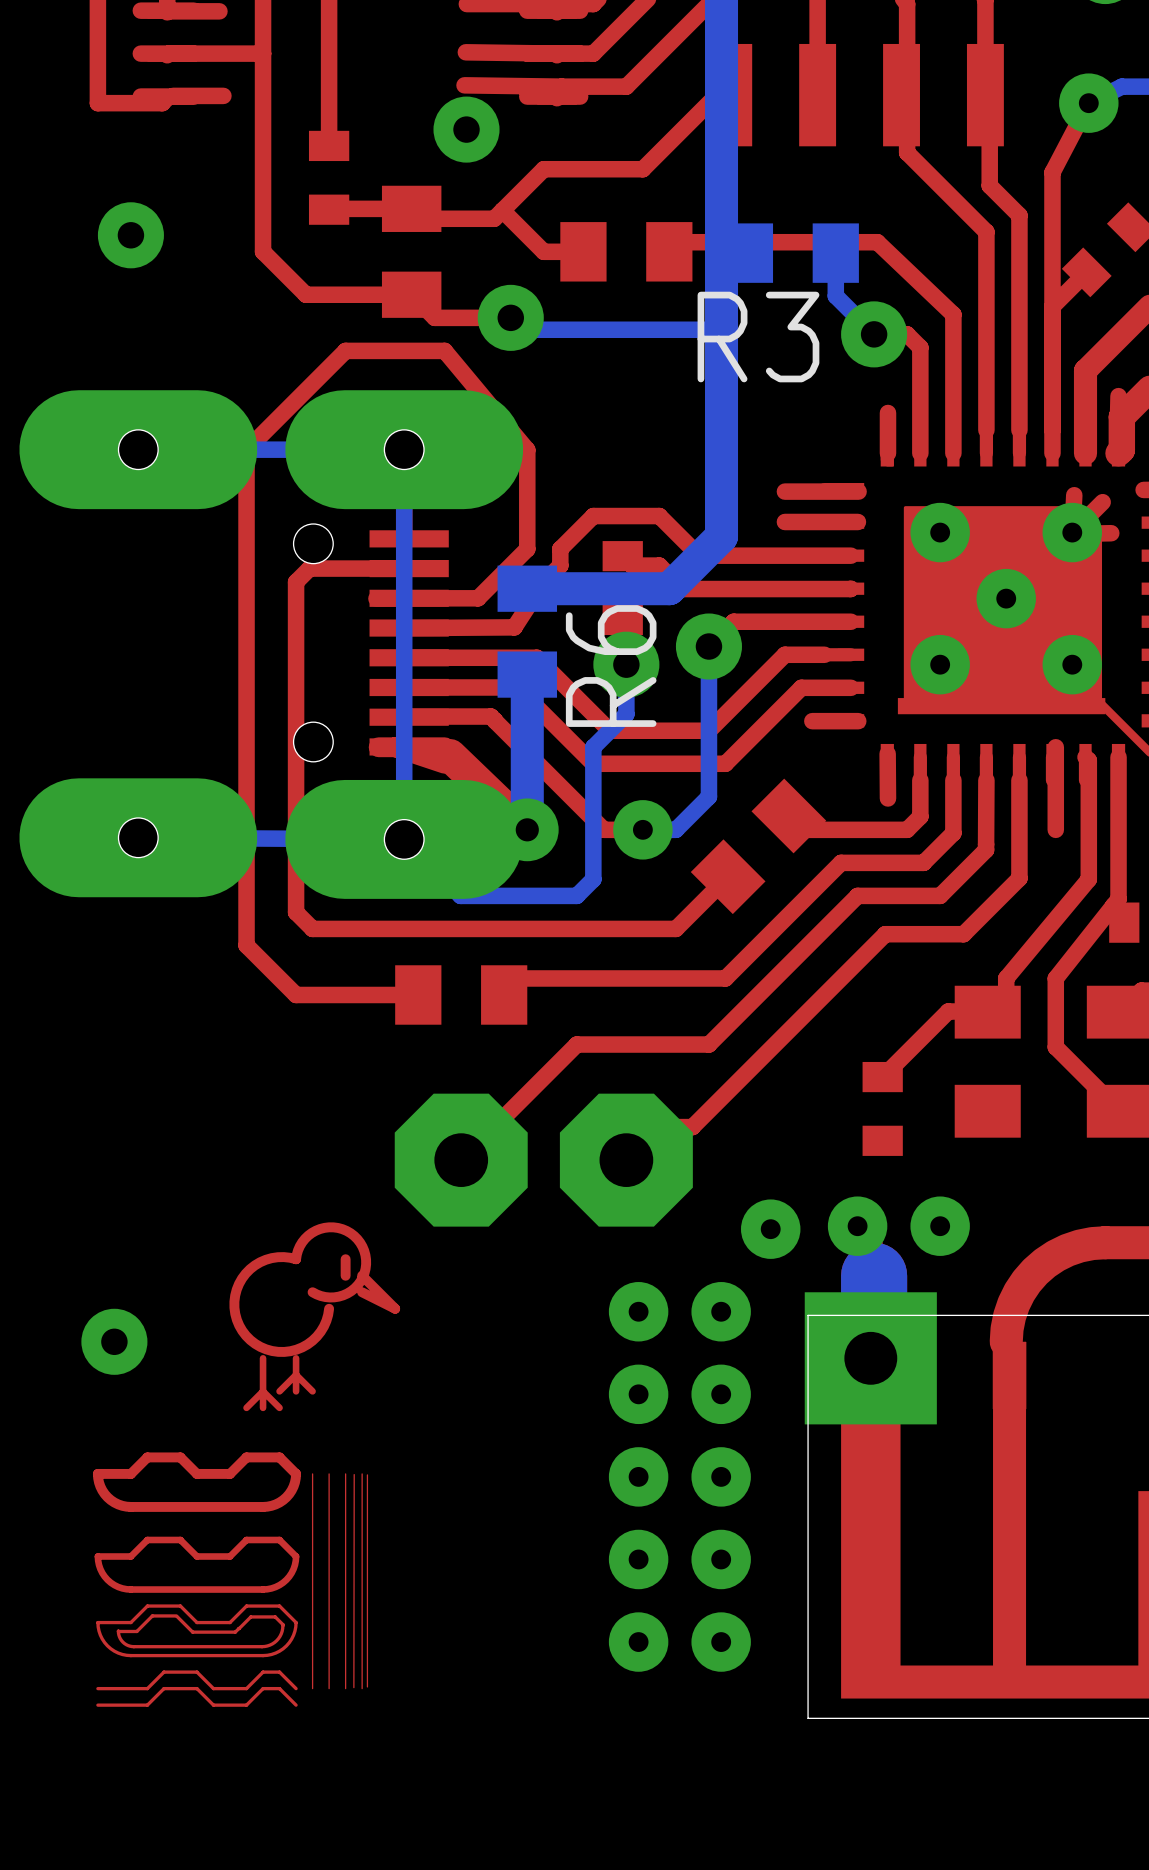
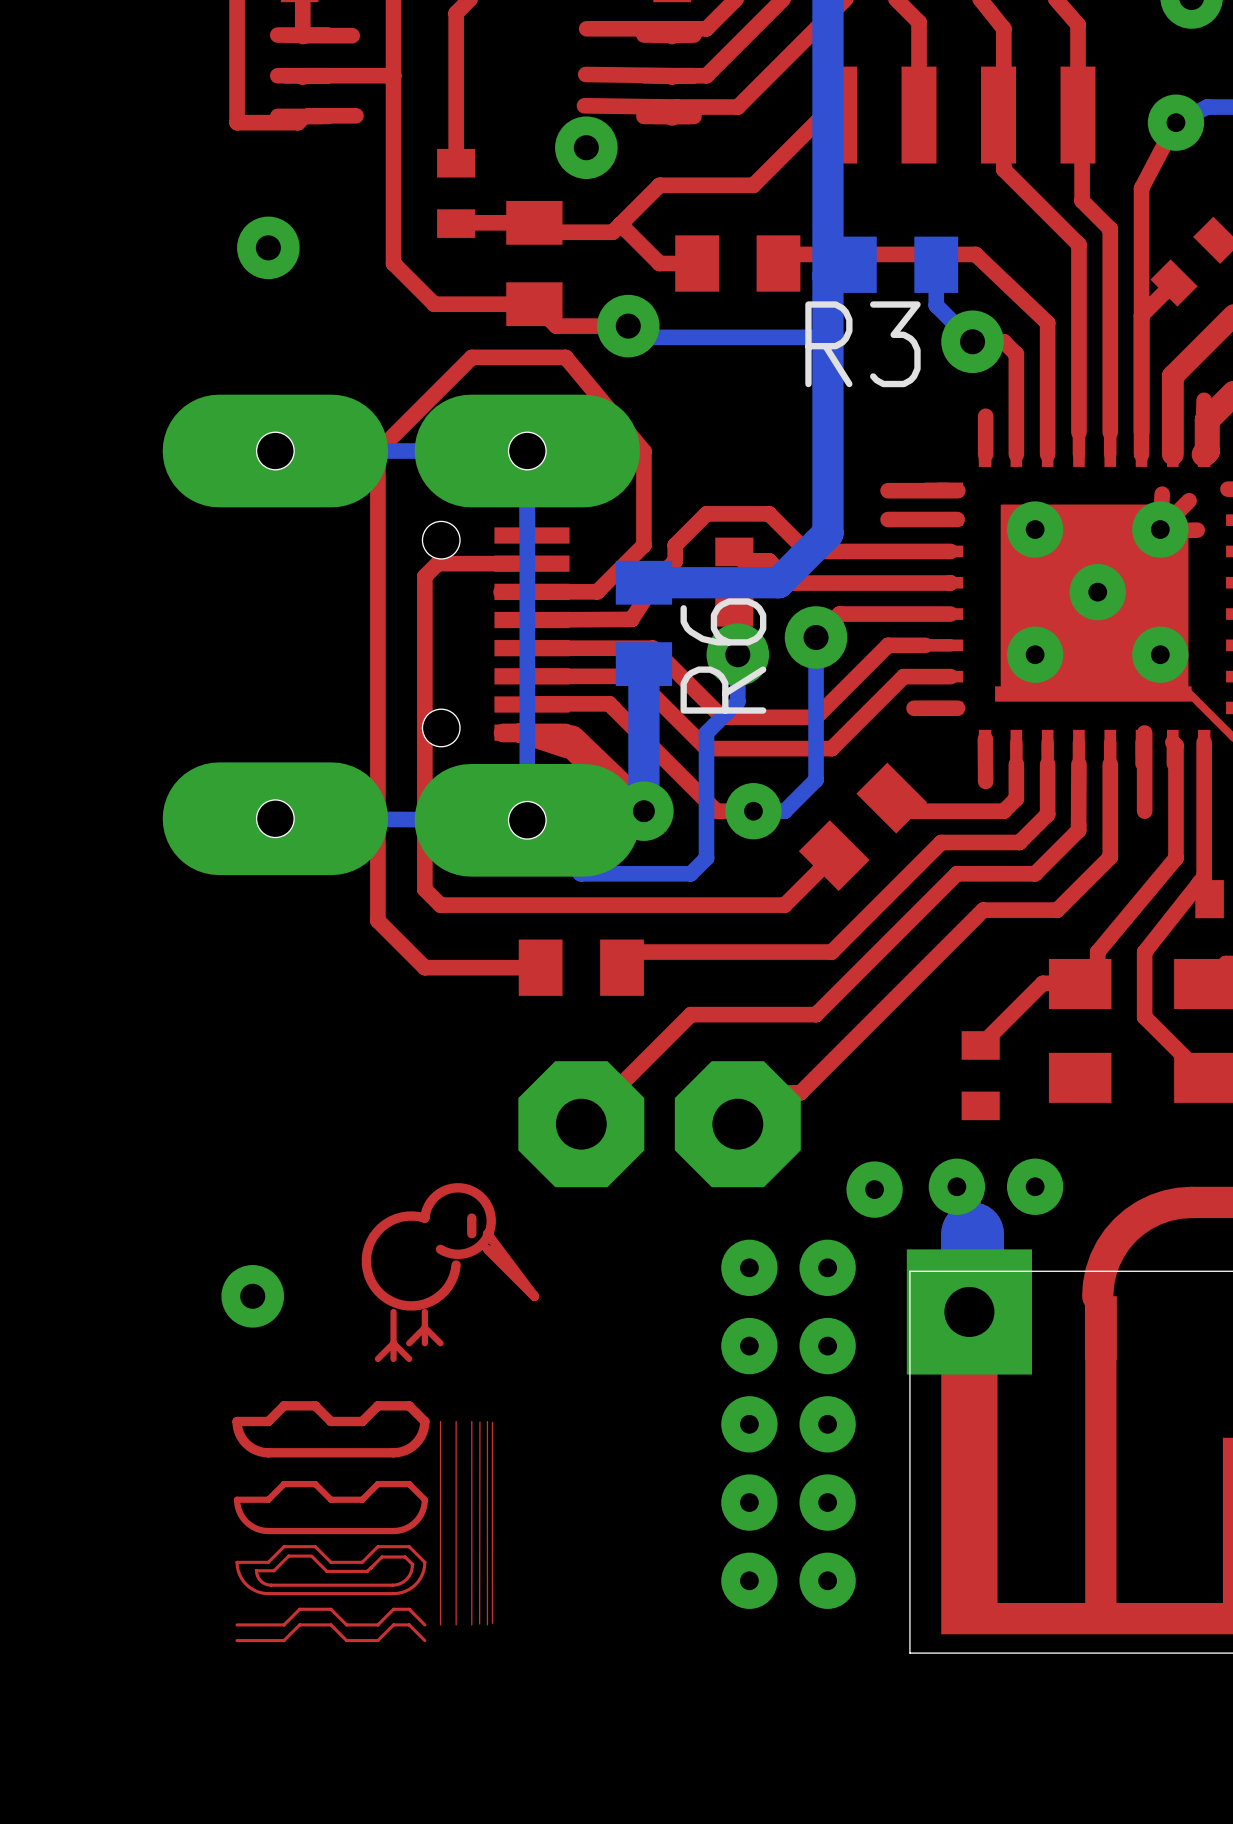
top track: (362, 1275) (395, 1308) (362, 1292) -> (487, 1233) (534, 1296) (487, 1249)

